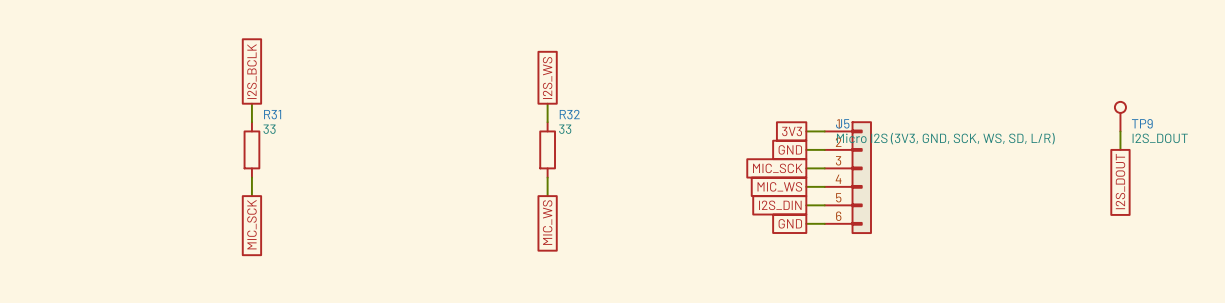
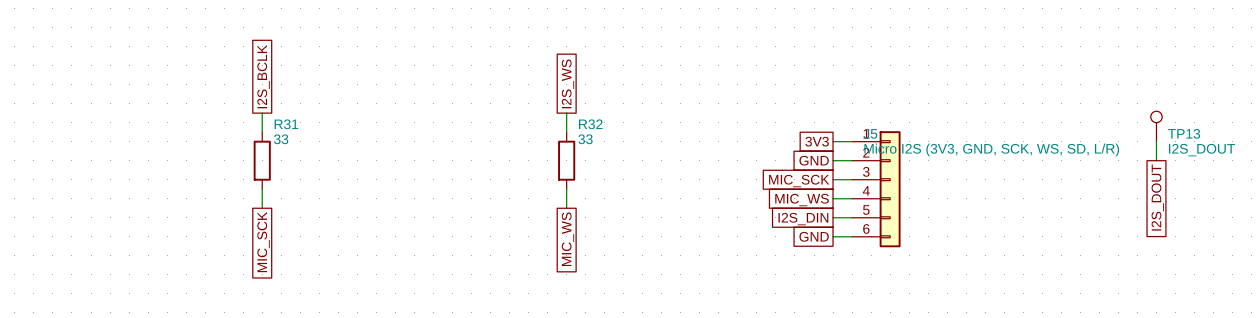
TP9 name: TP9 (1142, 123) -> TP13 (1184, 133)

